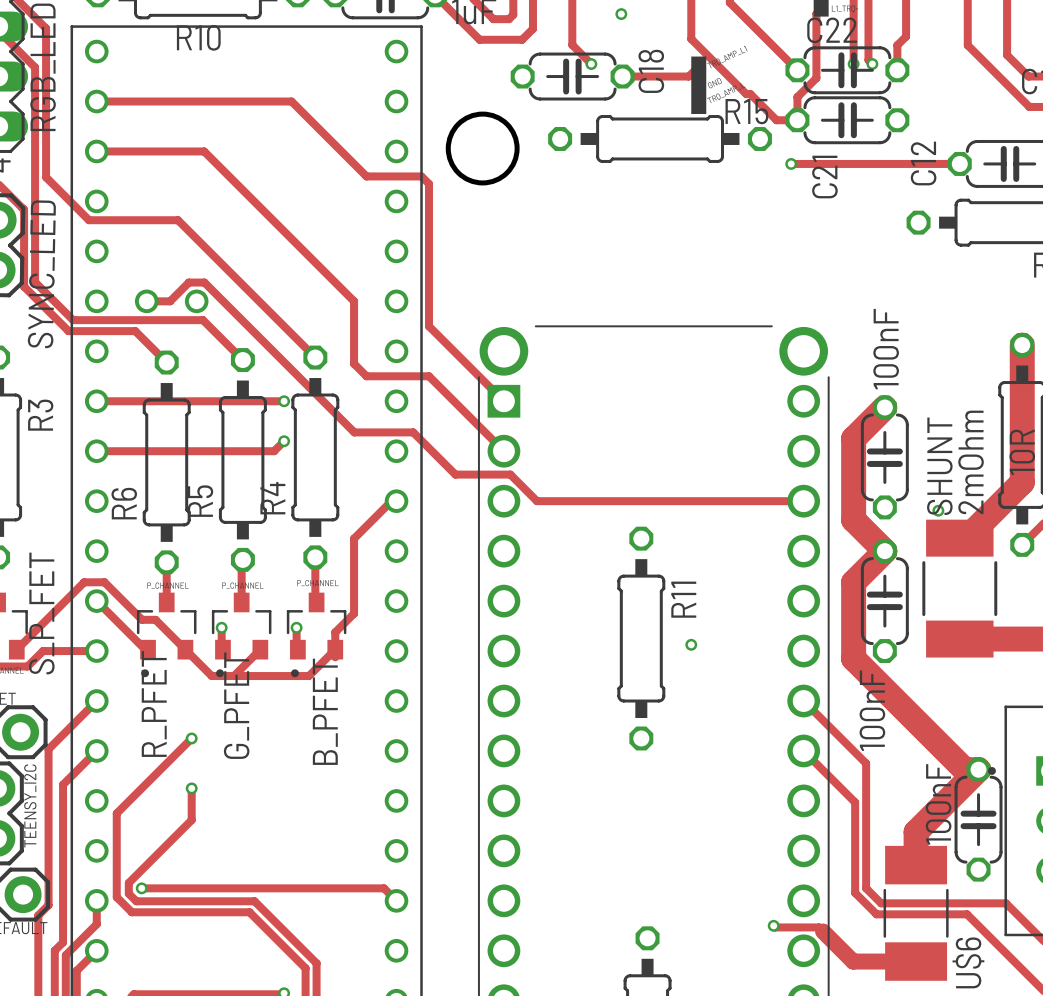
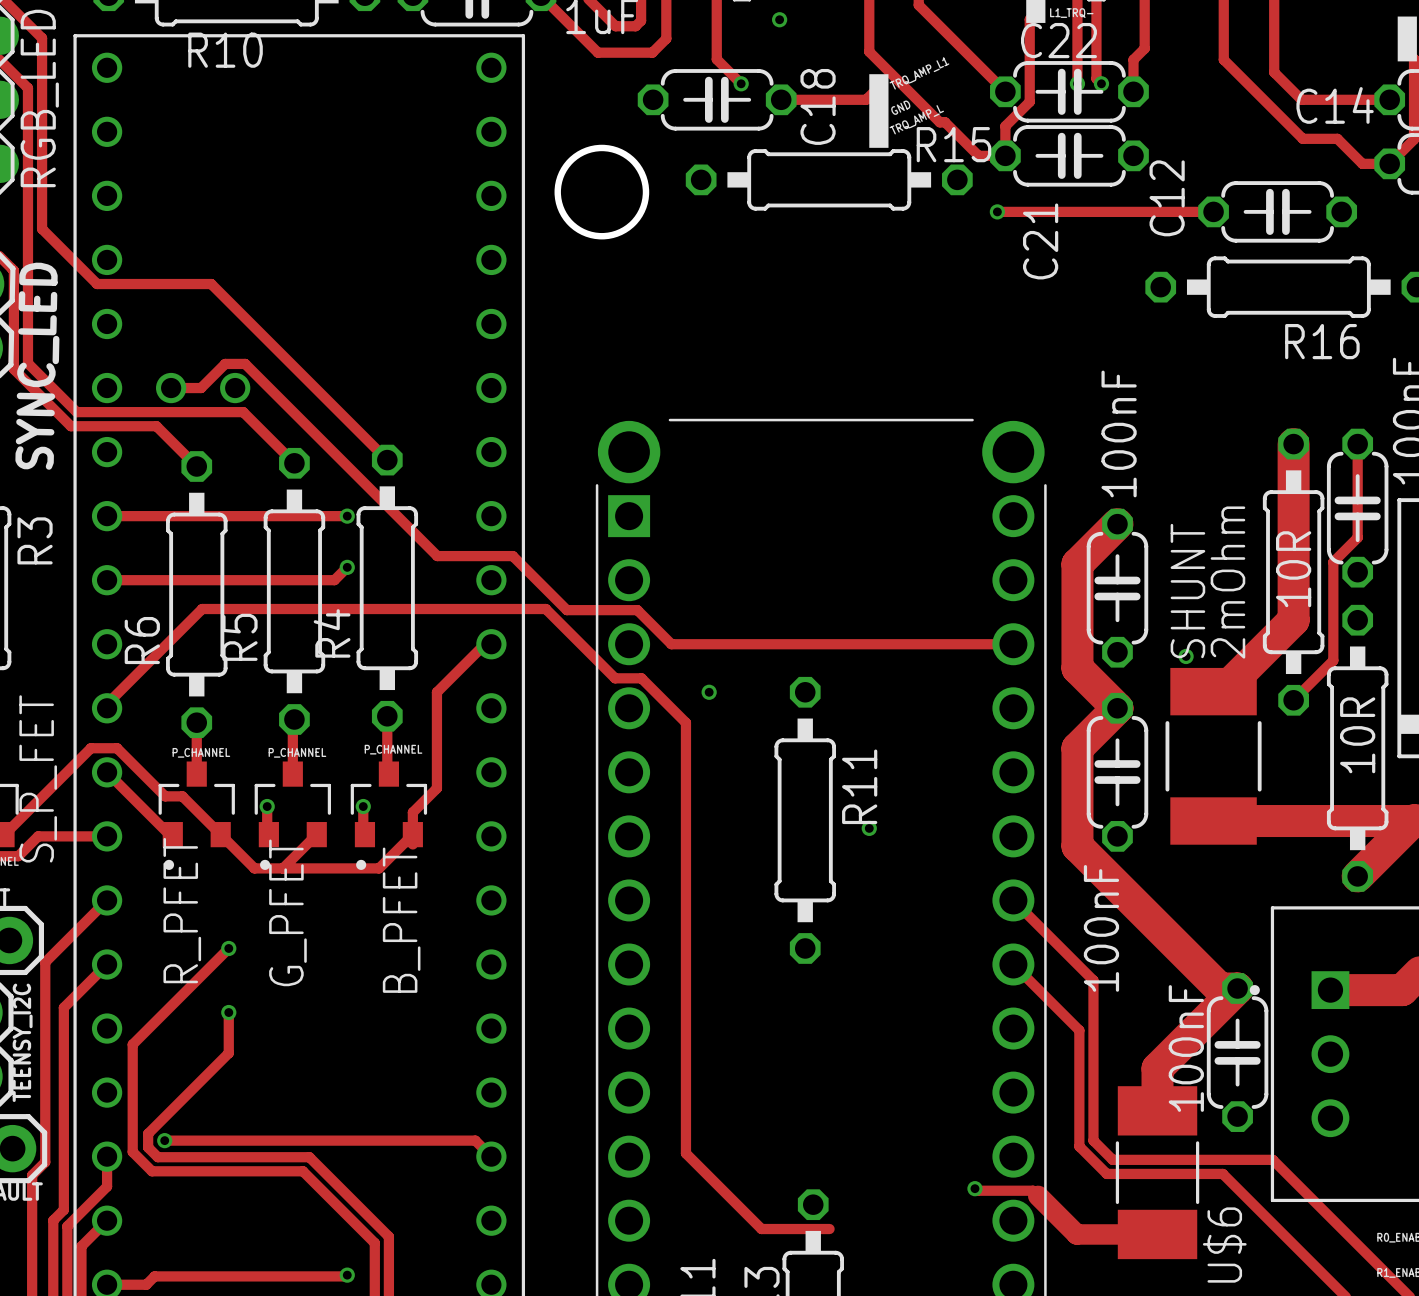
track: (96, 101) (291, 101) (366, 176) (421, 176) (428, 183) (428, 326) (503, 401) -> none
track: (96, 151) (204, 151) (354, 301) (354, 363) (366, 376) (428, 376) (503, 451) -> none
via: none -> (709, 692)
track: none -> (107, 708) (107, 704) (202, 609) (545, 609) (615, 678) (641, 678) (685, 722) (685, 1153) (761, 1229) (829, 1229)

